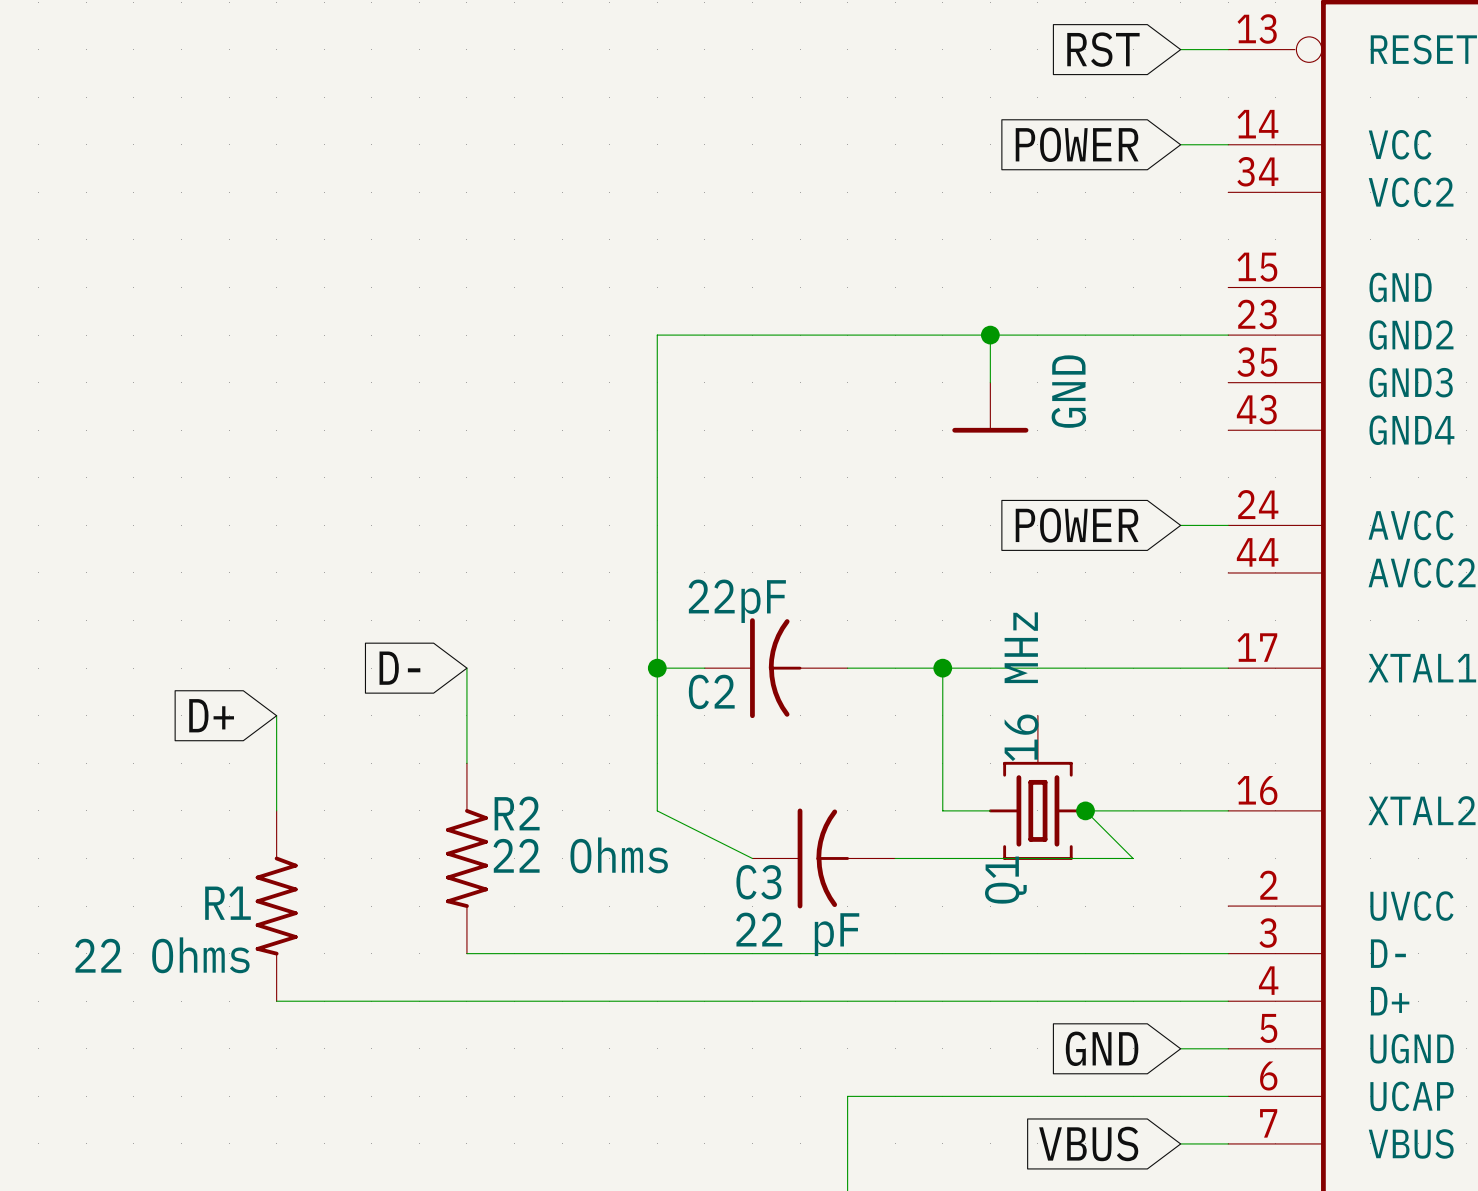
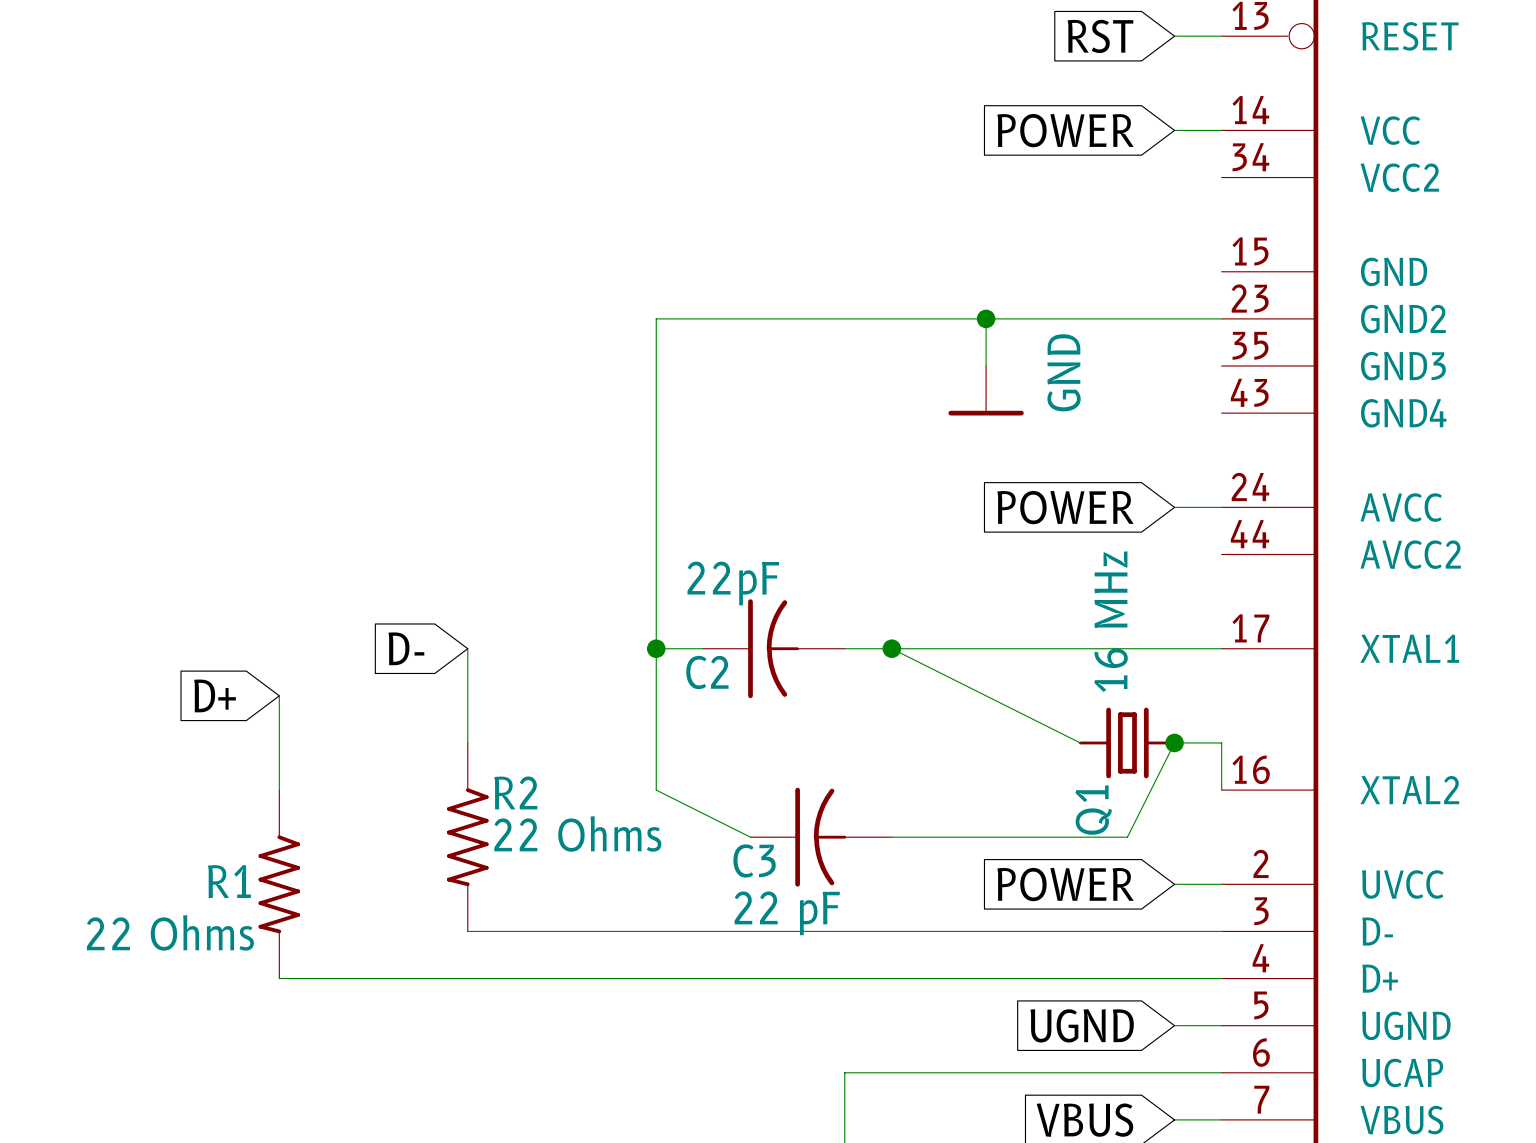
wire: none -> (891, 648) (1080, 742)
wire: (942, 668) (942, 810) (990, 810) -> none
junction position: (942, 668) -> (891, 648)
Q1 symbol: [988, 715, 1087, 860] -> [1078, 707, 1176, 779]
junction position: (1085, 810) -> (1174, 742)
wire: (1228, 810) (1085, 810) (1133, 858) -> (1221, 790) (1221, 742) (1174, 742) (1127, 837)
global label: none -> POWER (1065, 884)
wire: none -> (1174, 884) (1221, 884)
global label: GND (1102, 1048) -> UGND (1082, 1025)

